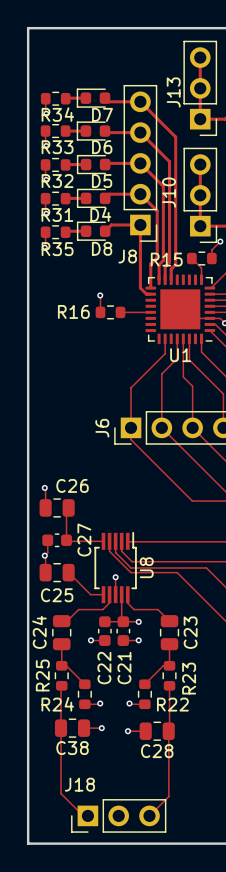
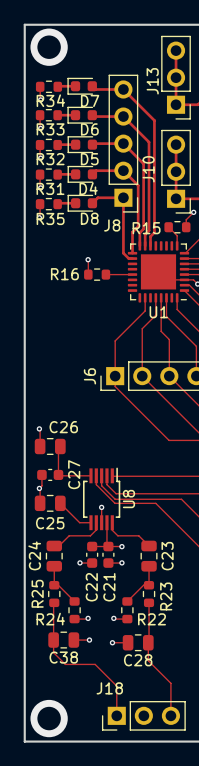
via: none -> (49, 47)
track: (168, 731) (168, 796) (149, 815) -> (148, 642) (148, 660) (170, 683) (170, 715)
track: (61, 742) (61, 793) (83, 815) (87, 815) -> (53, 652) (65, 664) (95, 664) (116, 686) (116, 715)
J18 position: (118, 815) -> (143, 715)
via: none -> (49, 718)

